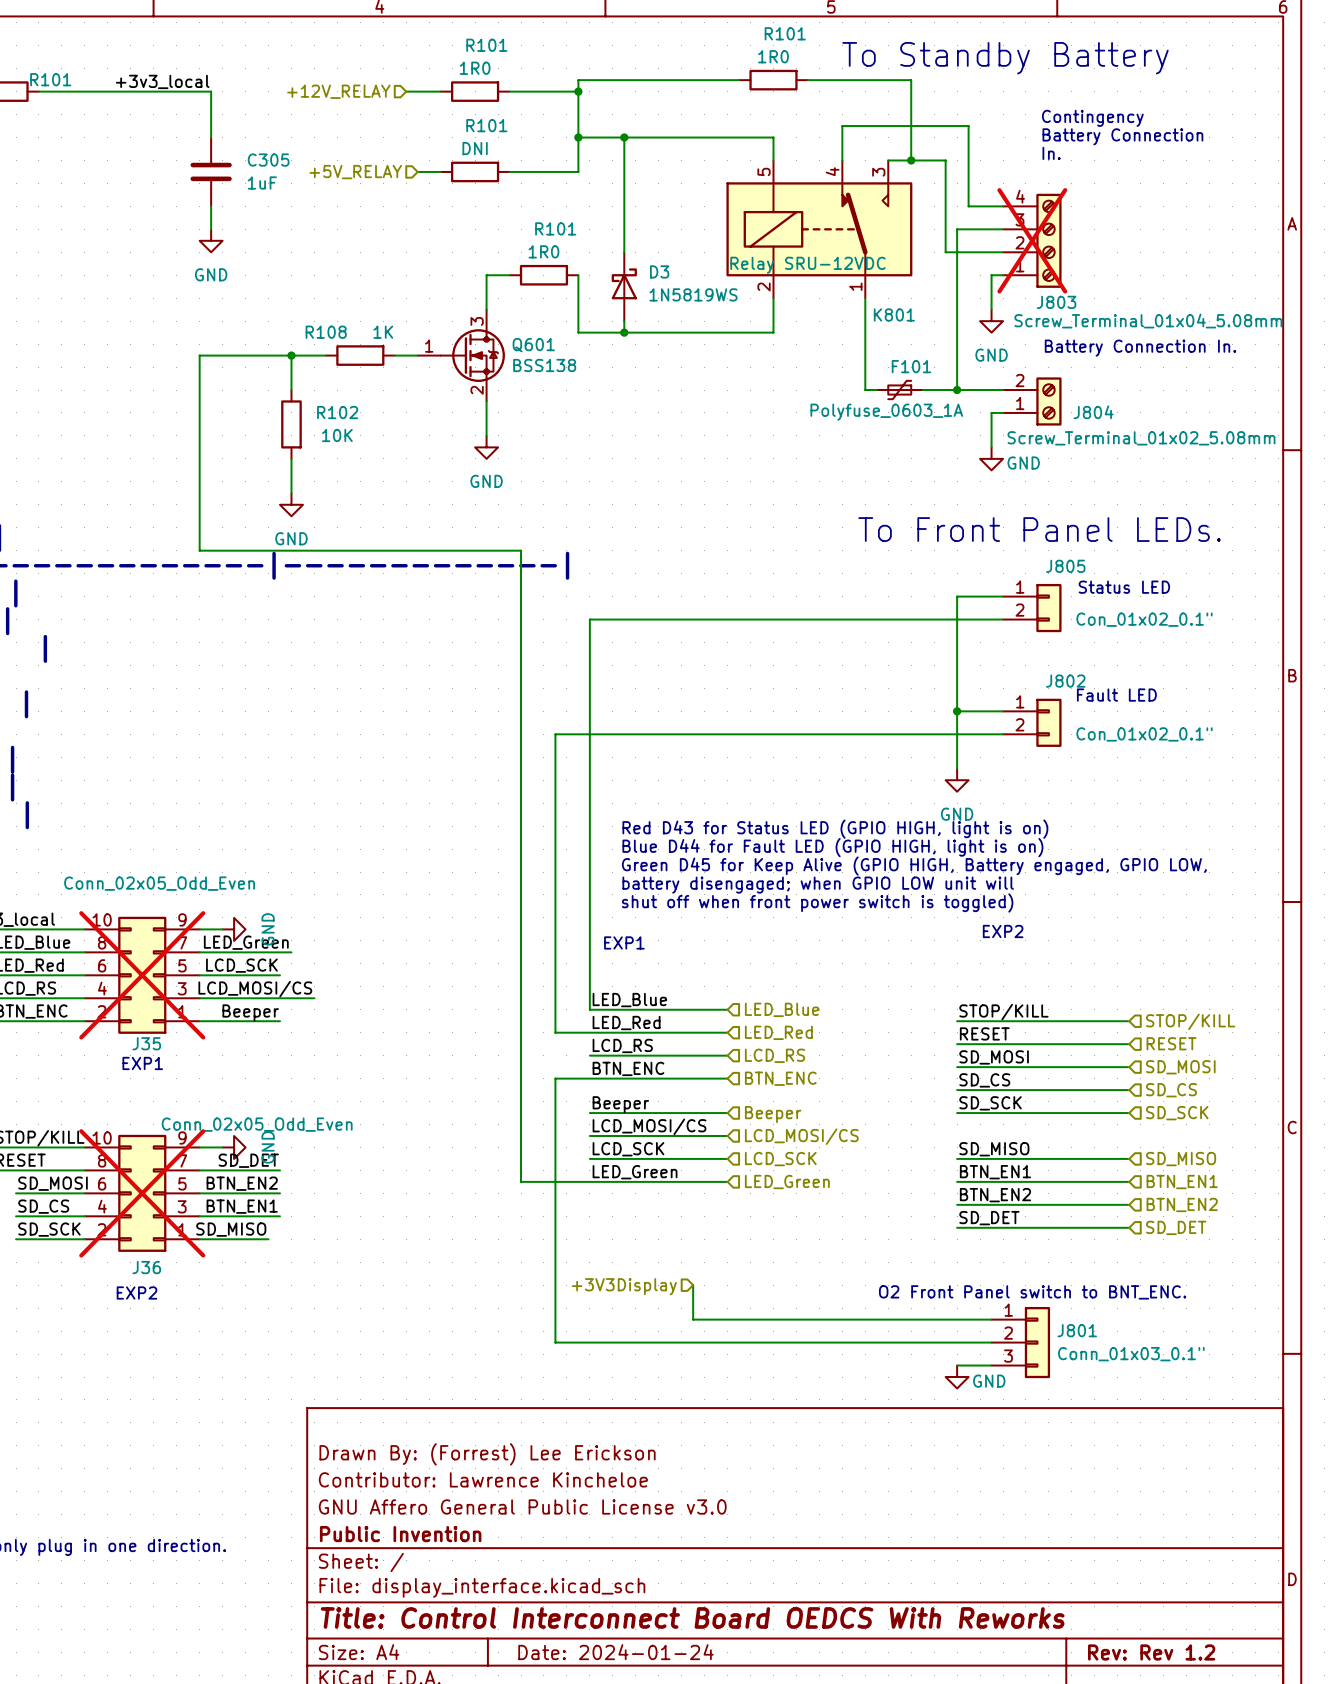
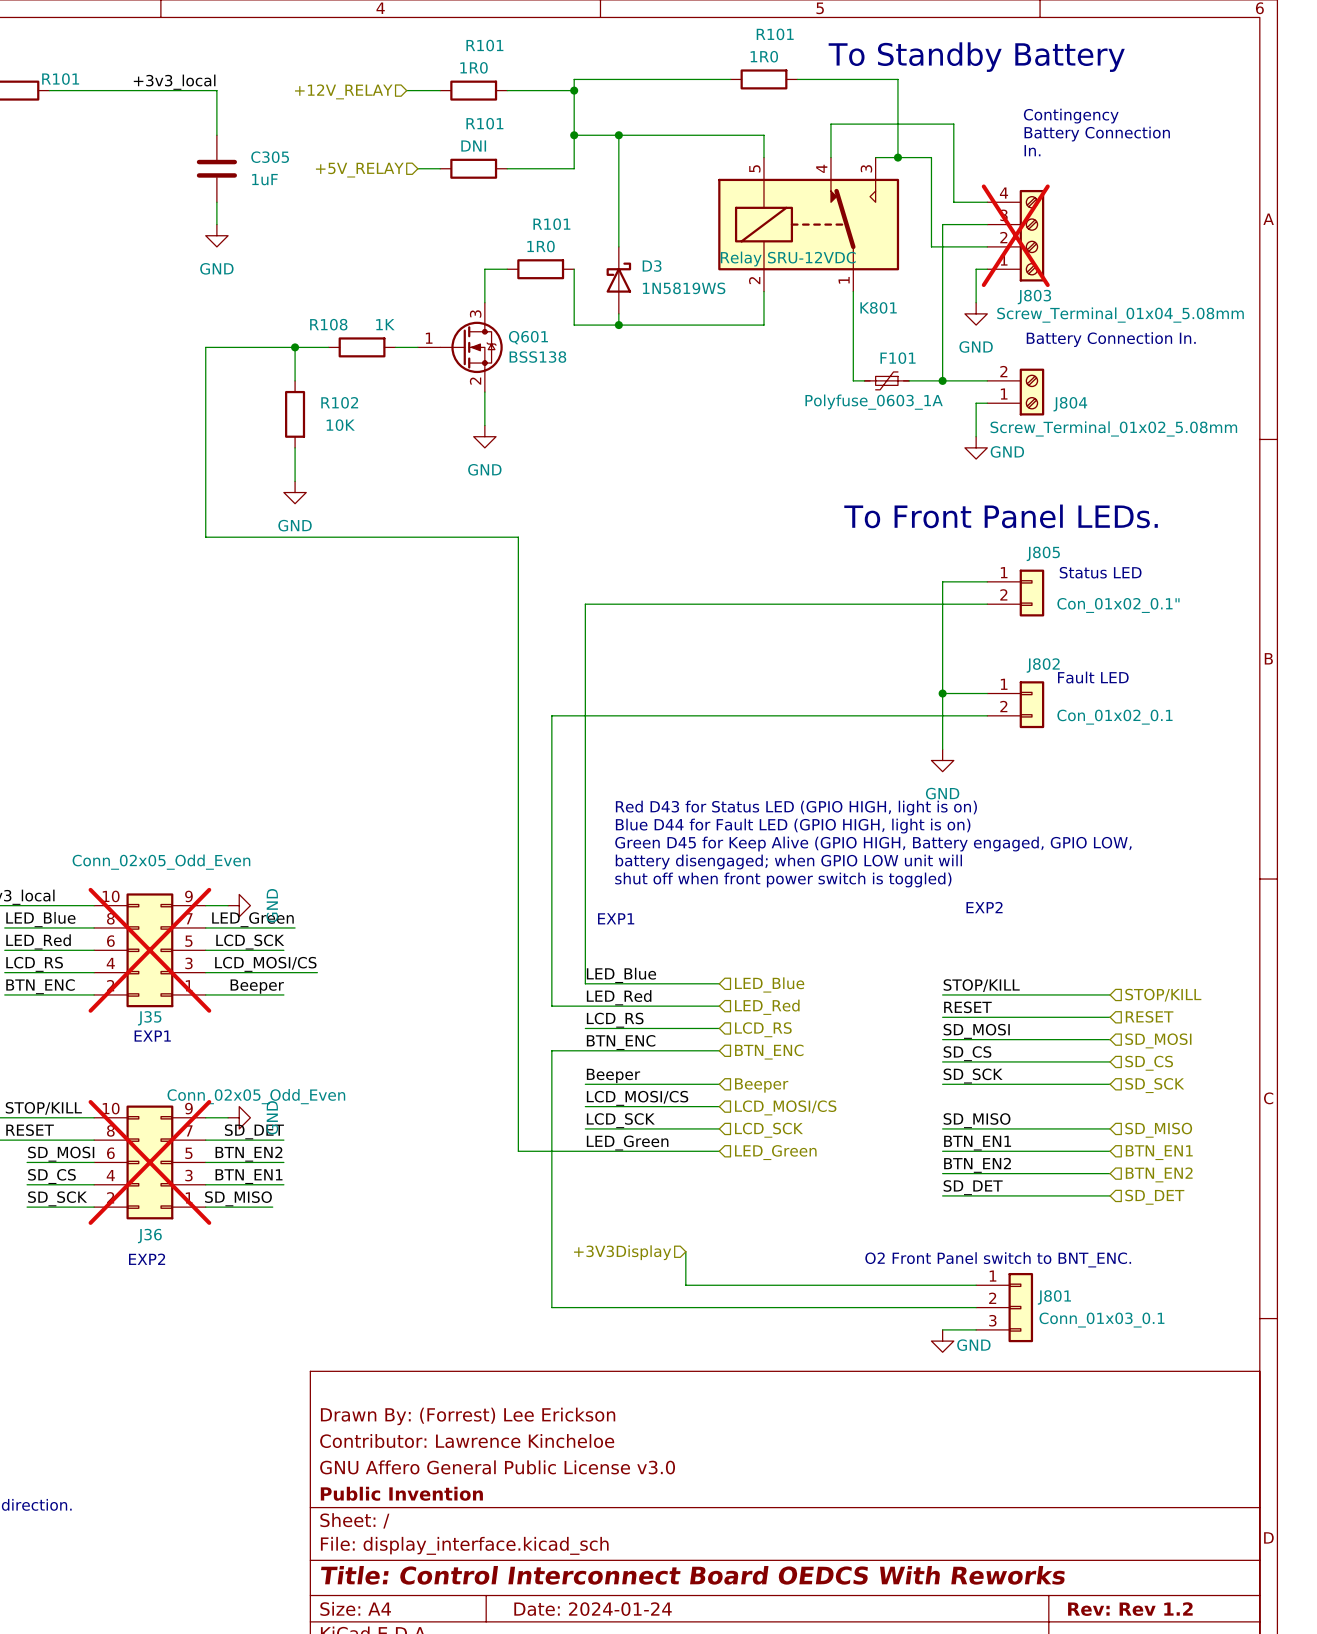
J802 value: Con_01x02_0.1" (1144, 734) -> Con_01x02_0.1 (1114, 717)
J801 value: Conn_01x03_0.1" (1131, 1354) -> Conn_01x03_0.1 (1101, 1320)

